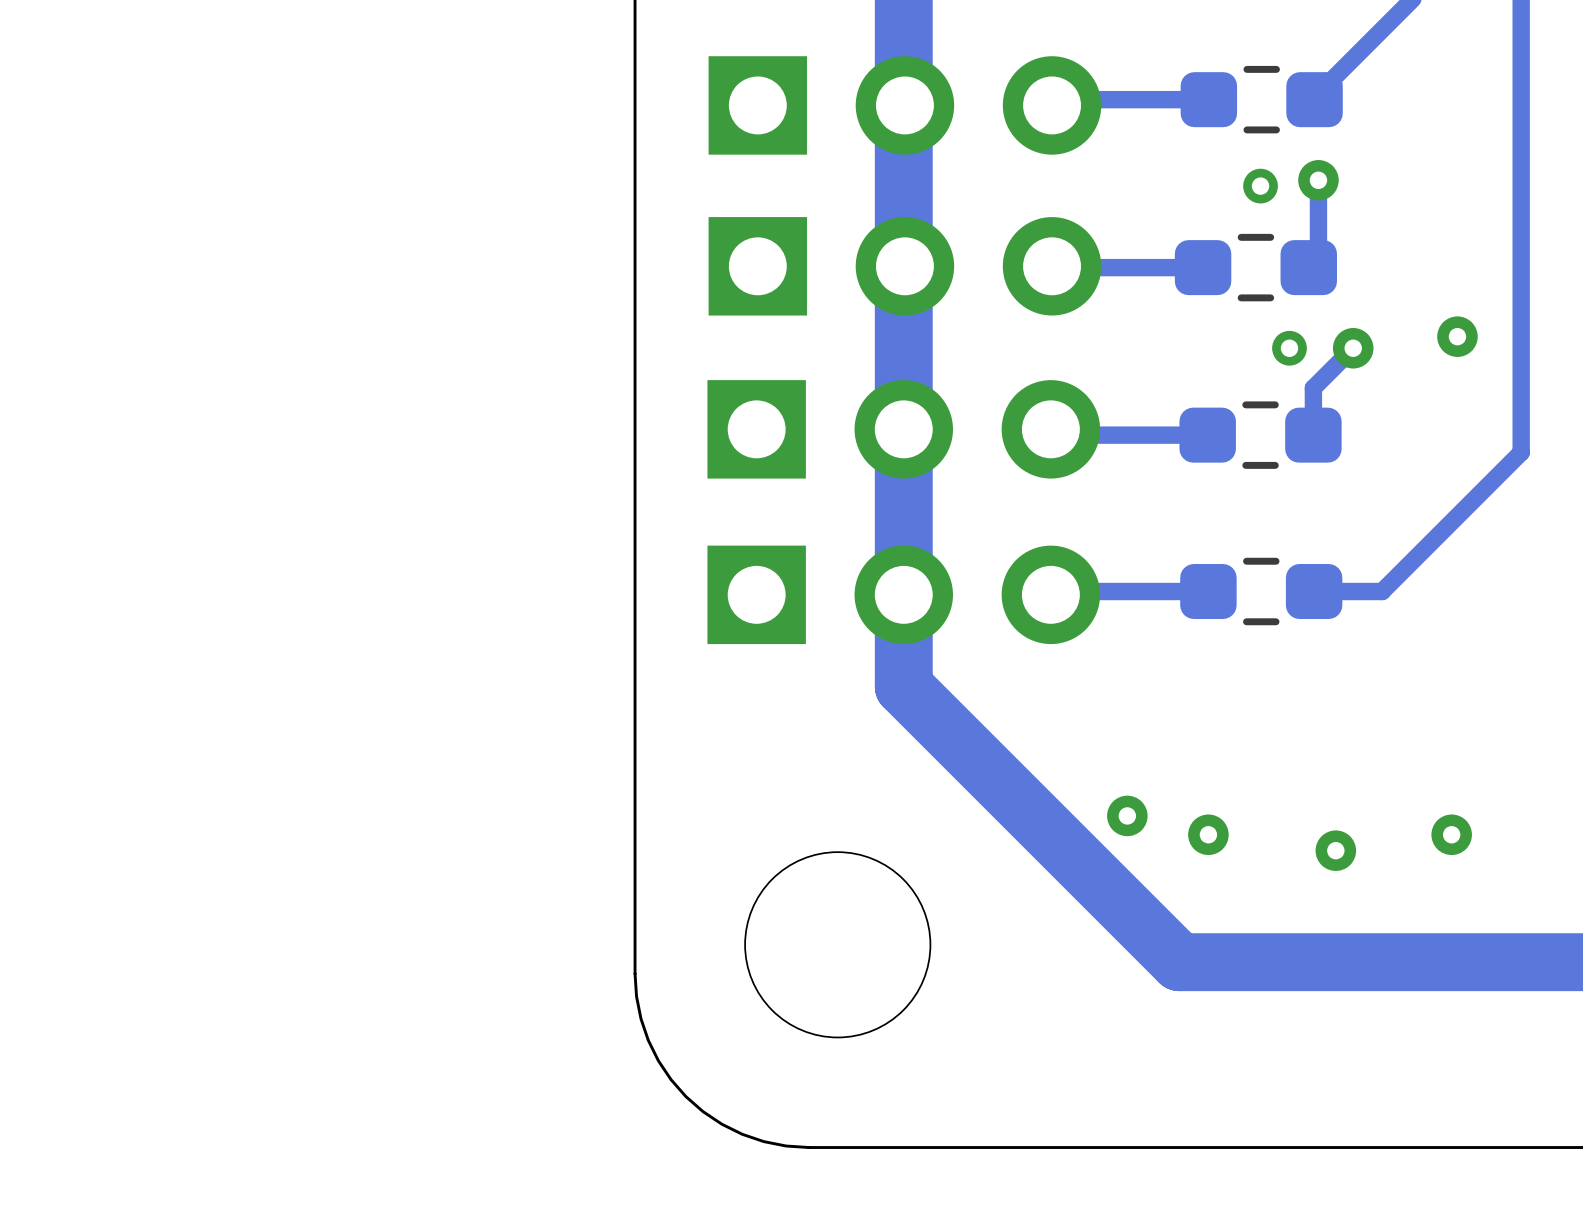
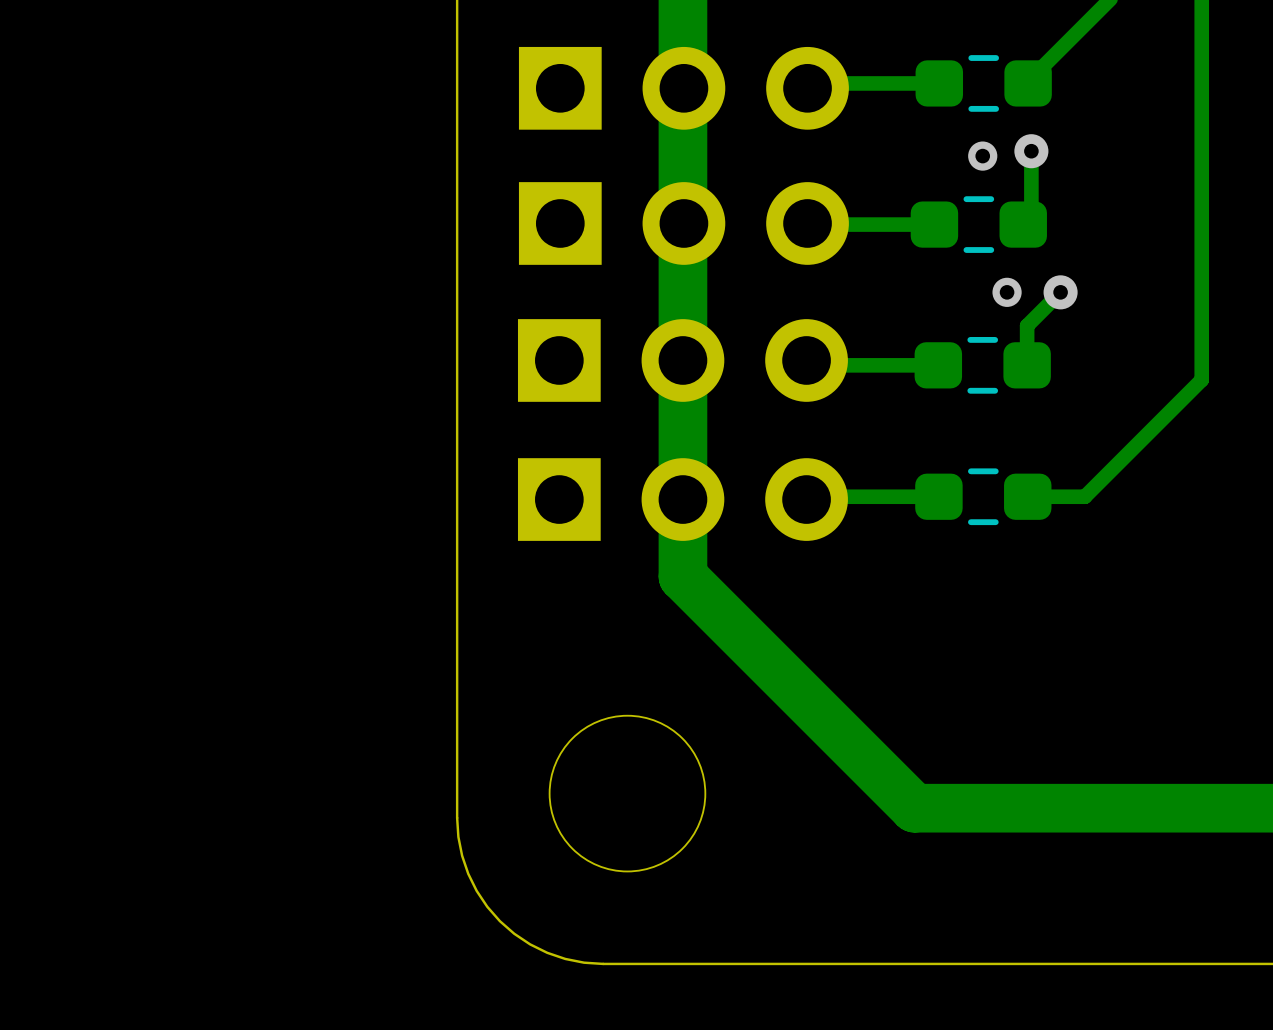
via: (1457, 336) -> none
via: (1127, 815) -> none
via: (1208, 834) -> none
via: (1451, 834) -> none
via: (1335, 850) -> none

